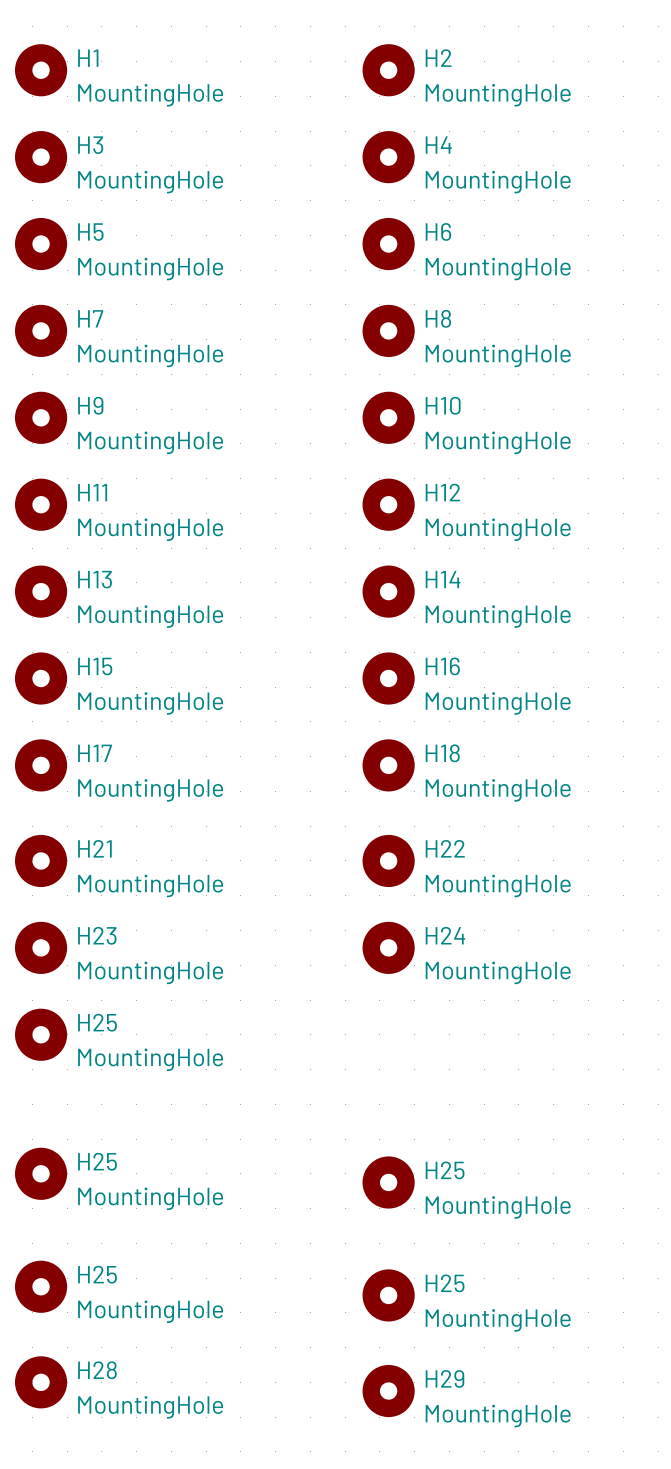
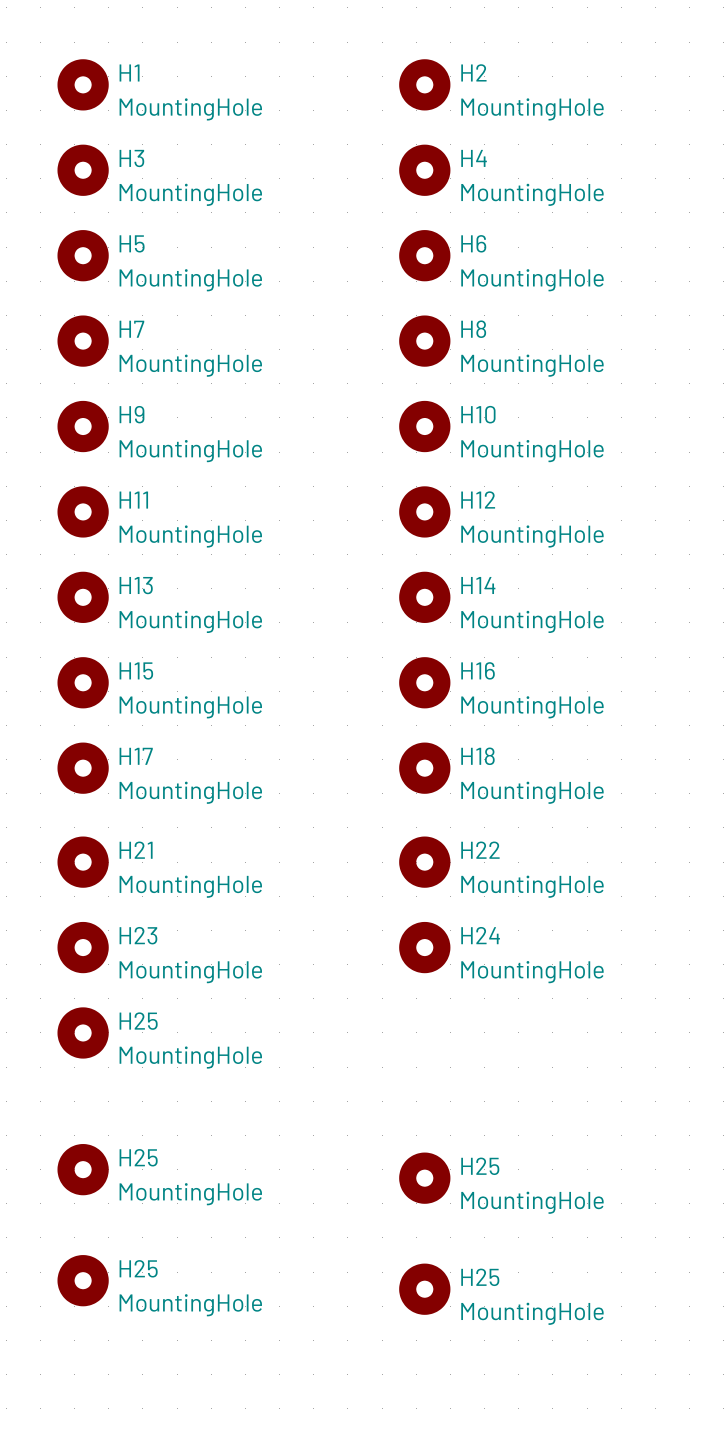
H28: MountingHole (41, 1382) -> none
H29: MountingHole (388, 1391) -> none

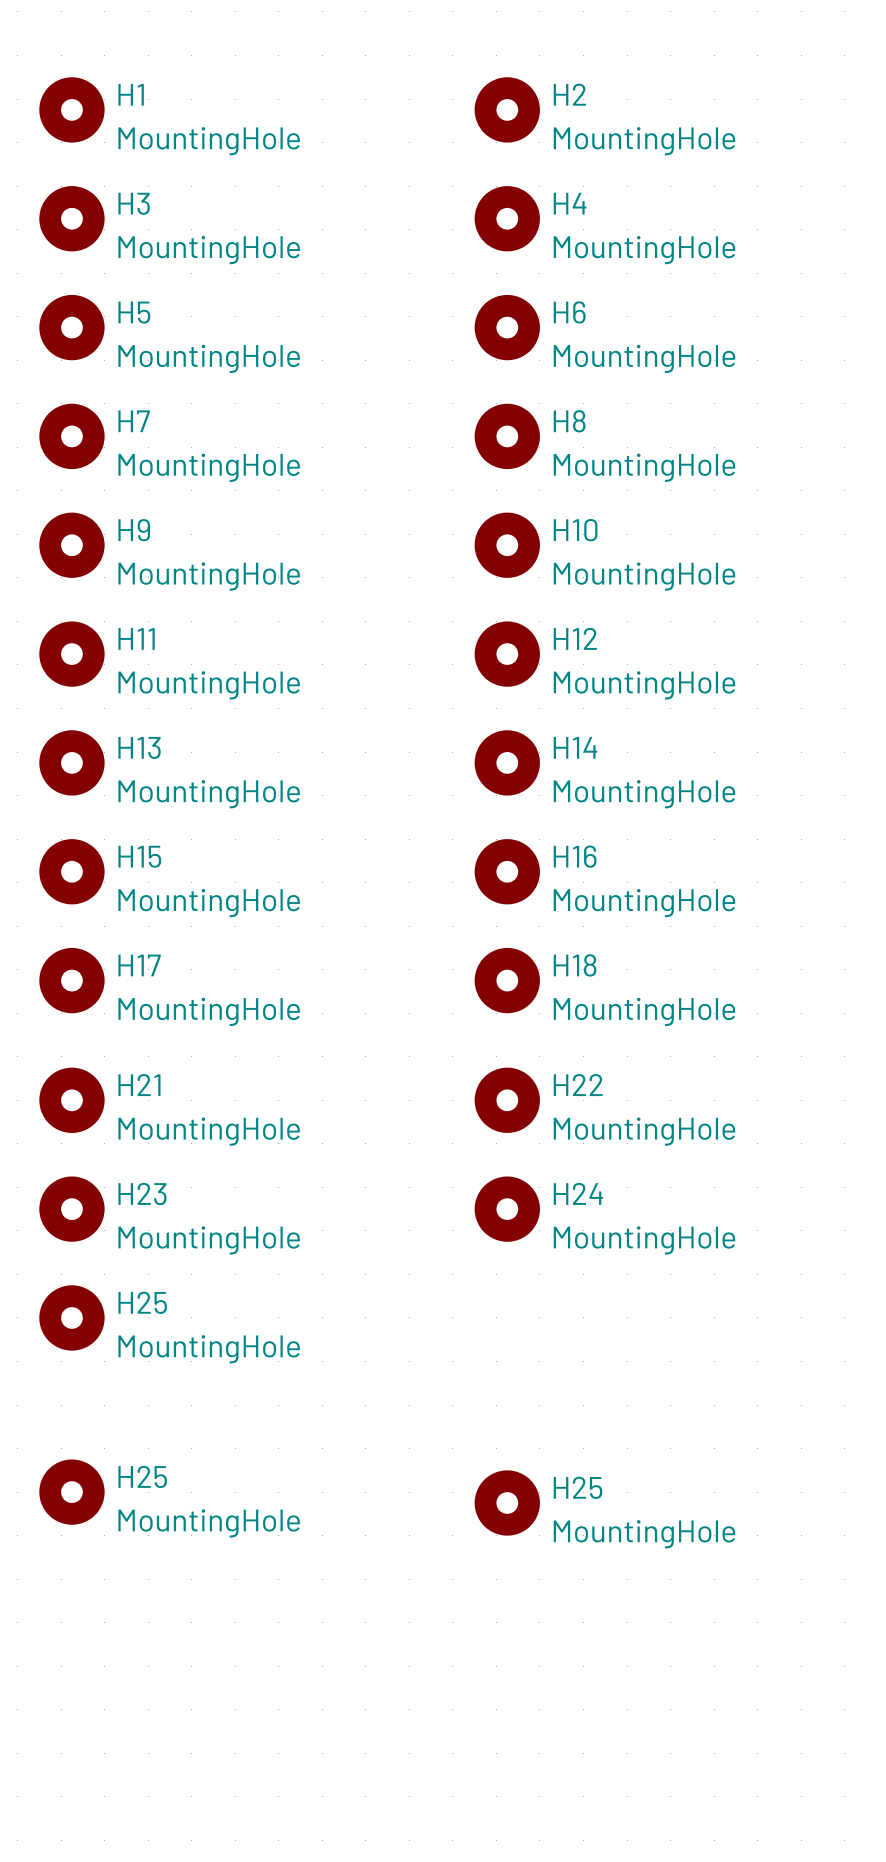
H25: MountingHole (83, 1280) -> none
H25: MountingHole (424, 1289) -> none

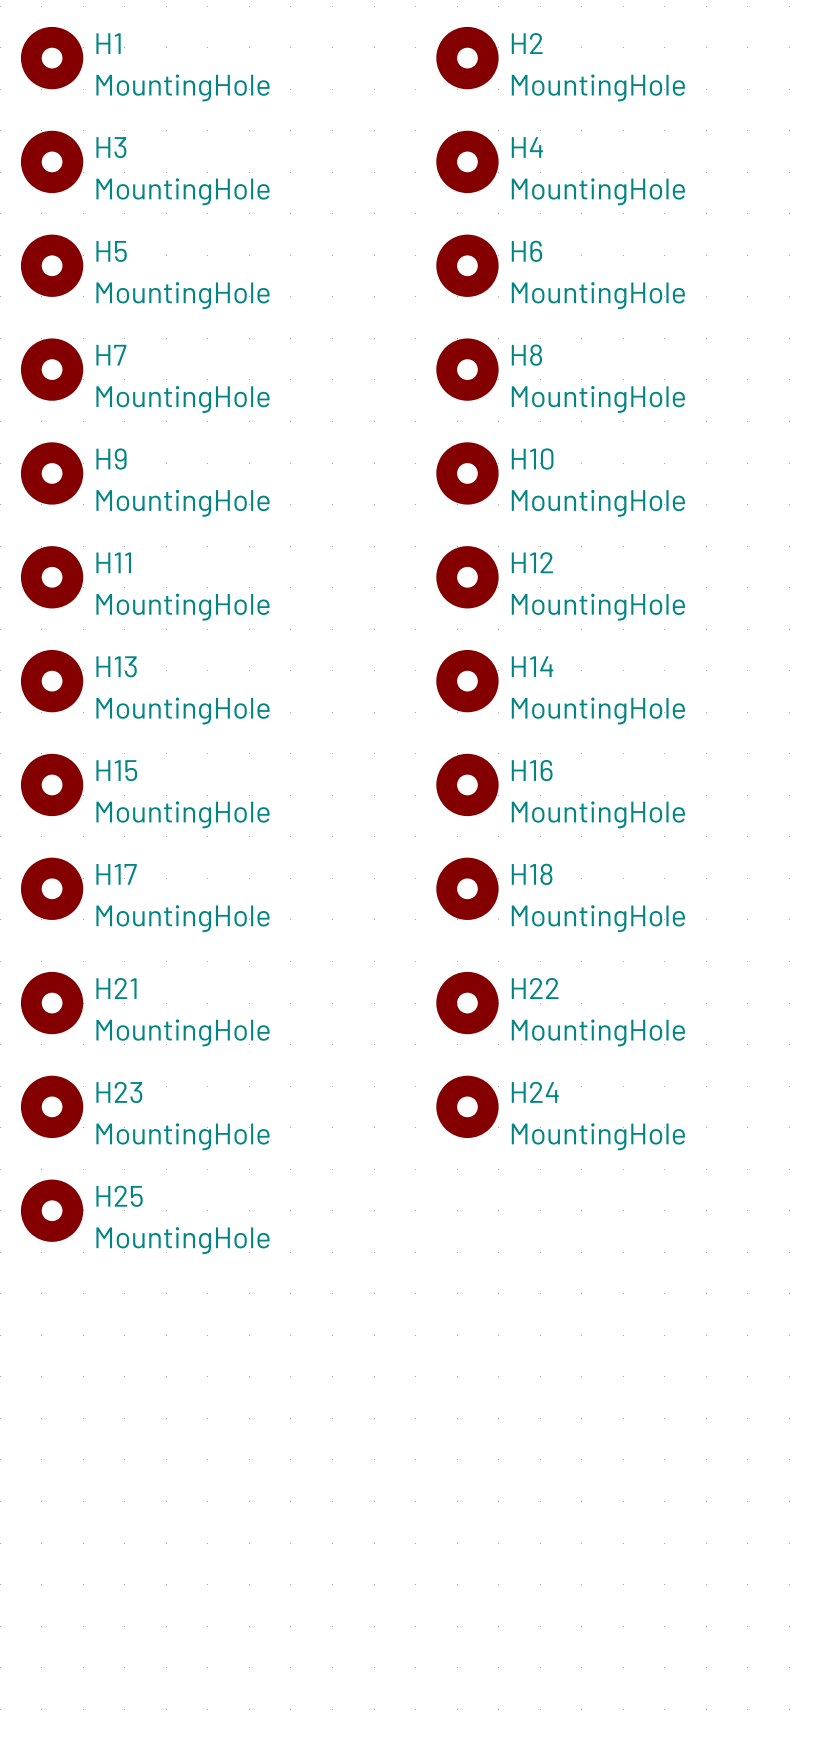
H25: MountingHole (71, 1492) -> none
H25: MountingHole (507, 1502) -> none

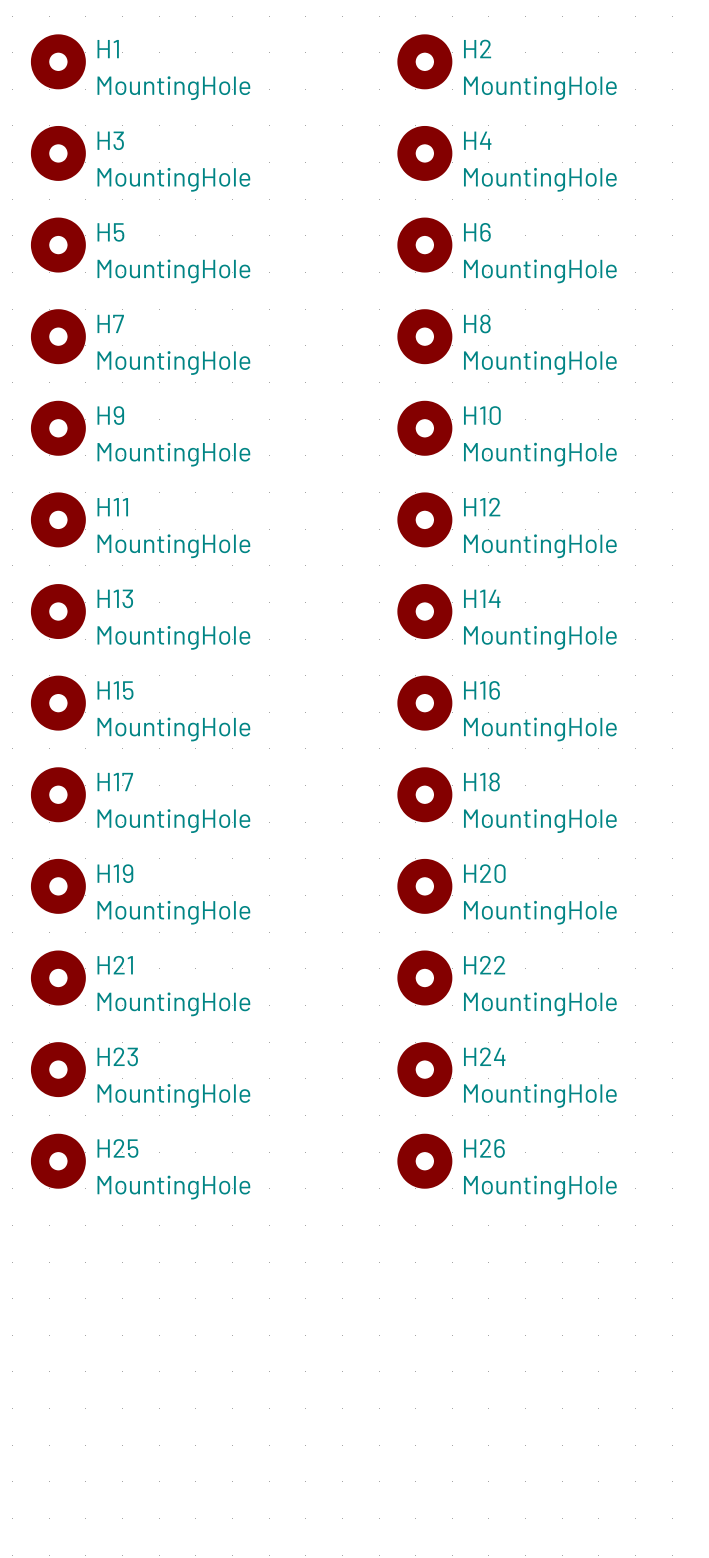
H19: none -> MountingHole (58, 886)
H20: none -> MountingHole (424, 886)
H21 position: (52, 1003) -> (58, 977)
H22 position: (467, 1003) -> (424, 977)
H23 position: (52, 1106) -> (58, 1069)
H24 position: (467, 1106) -> (424, 1069)
H25 position: (52, 1210) -> (58, 1161)
H26: none -> MountingHole (424, 1161)

